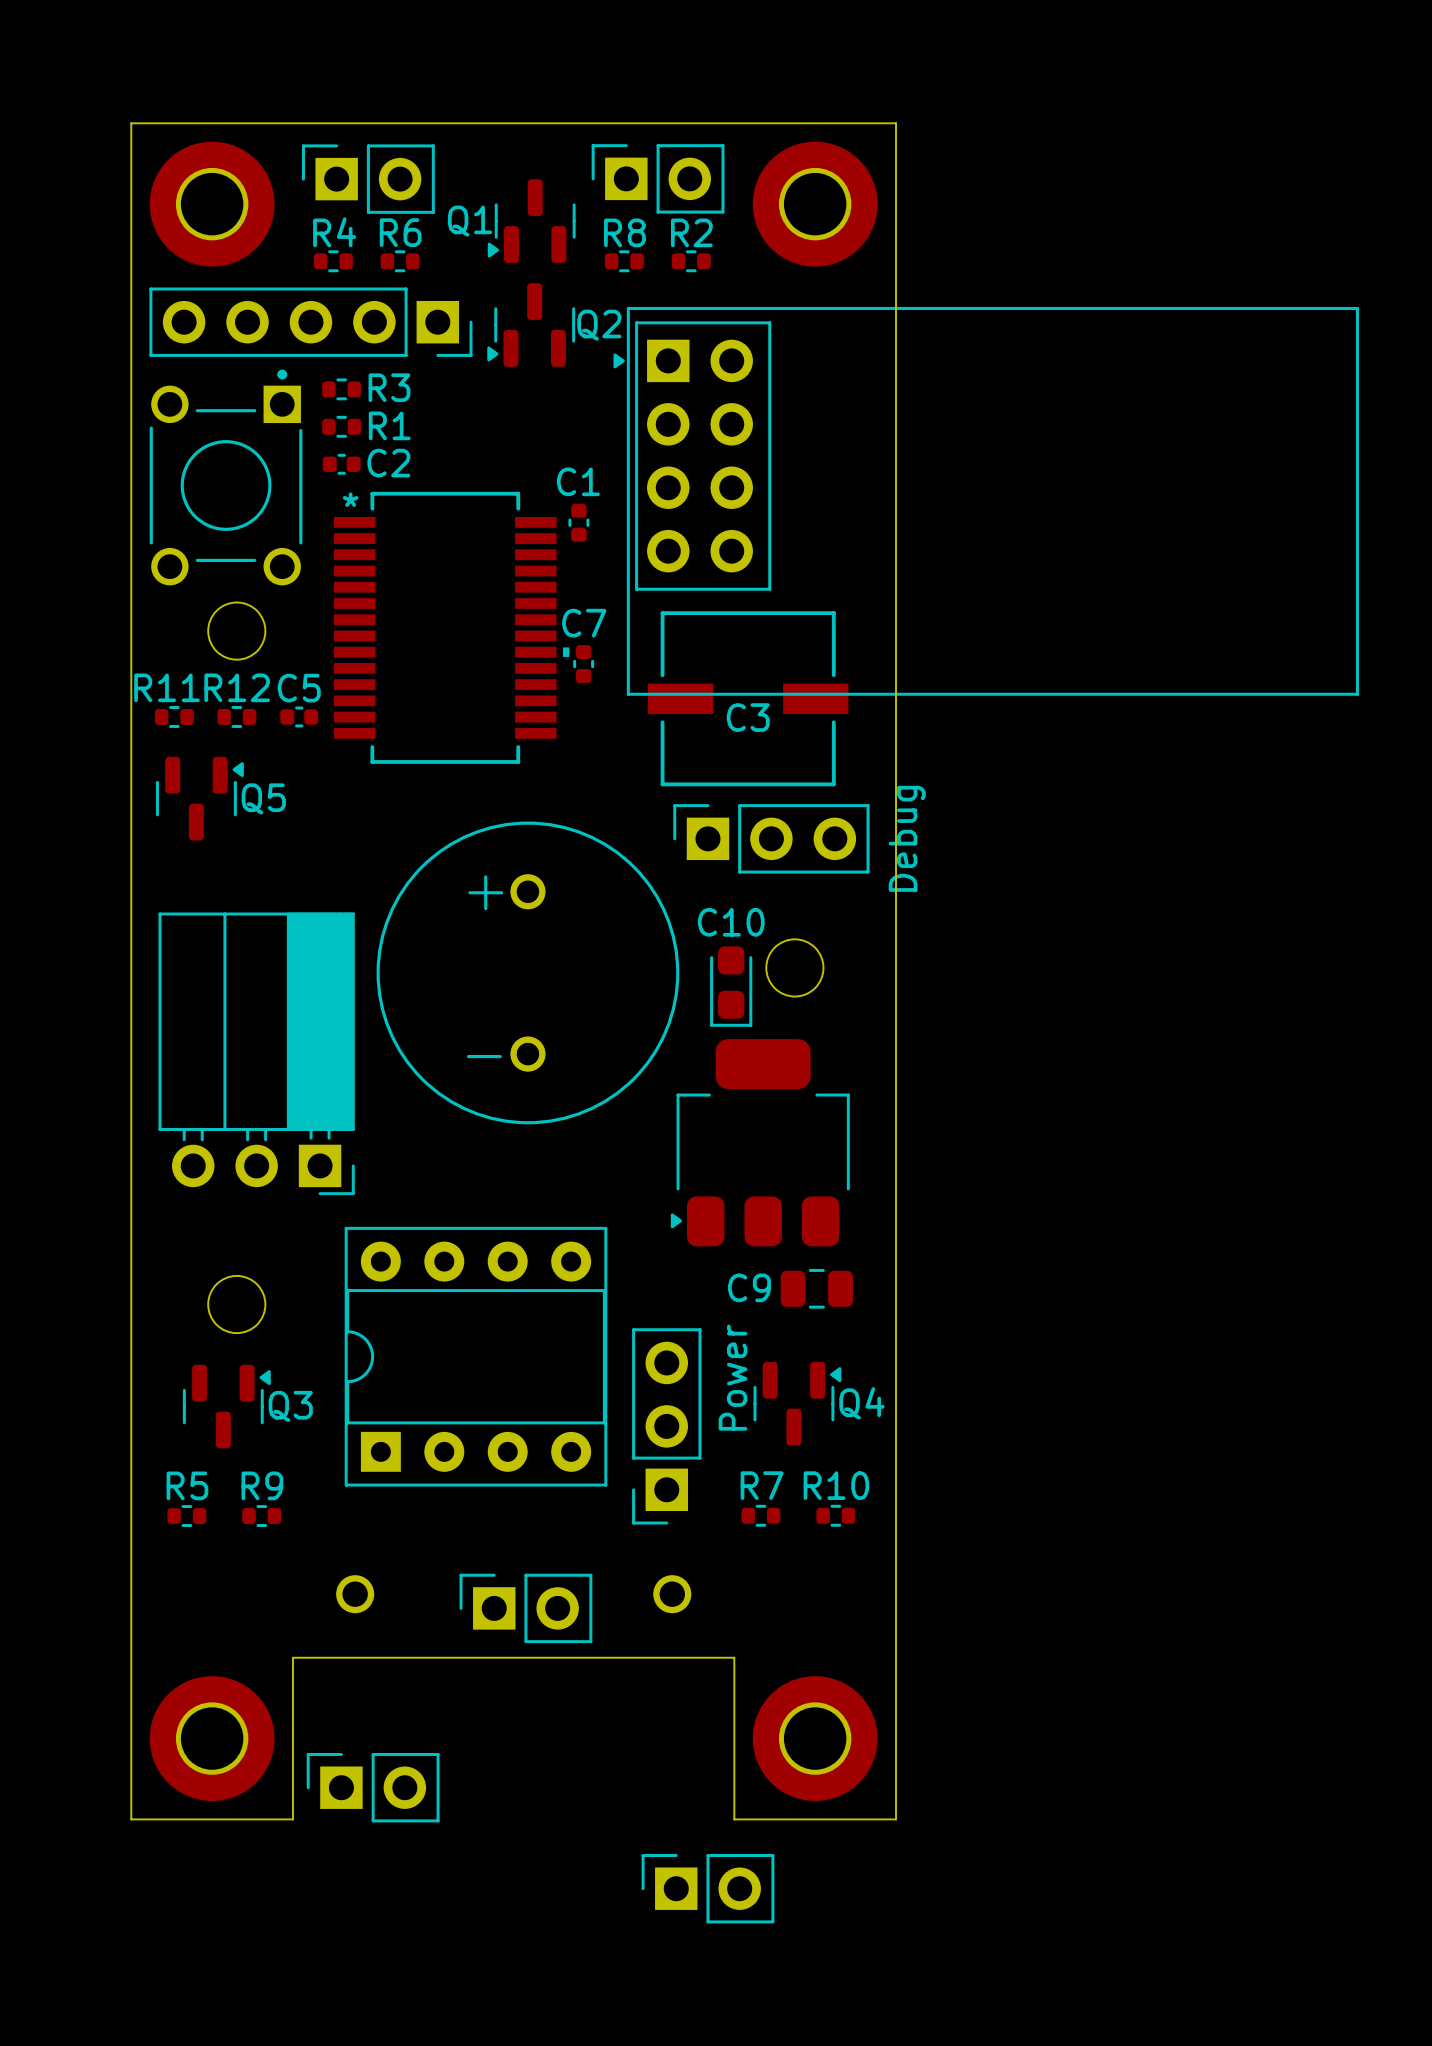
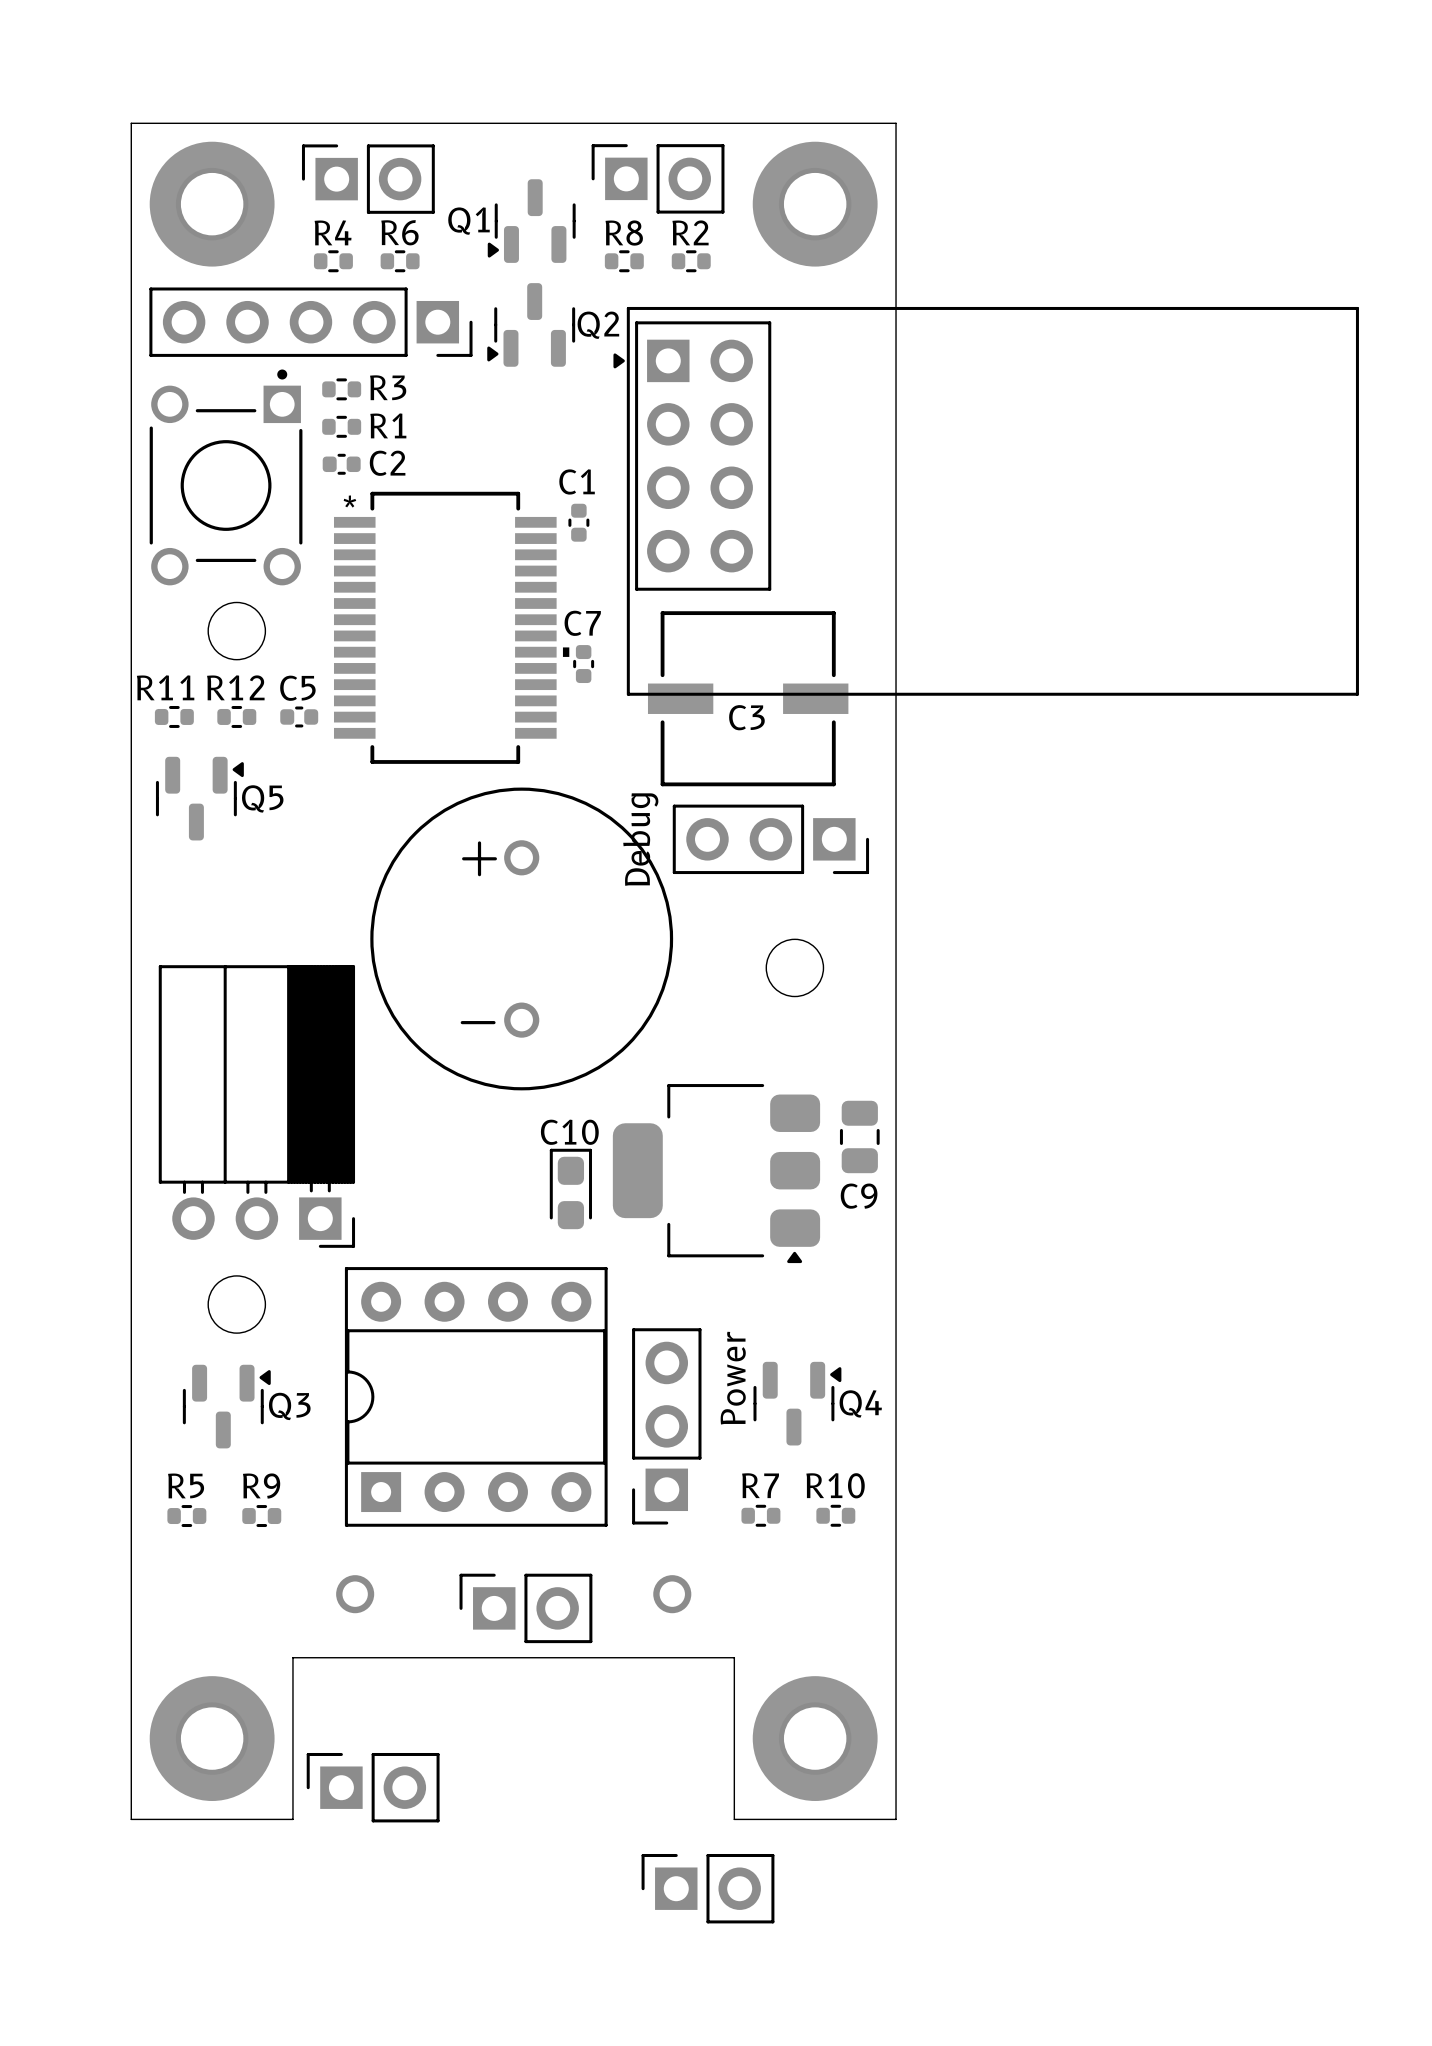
part rotation: 0° (771, 838) -> 180° (770, 839)
part position: (527, 972) -> (521, 938)
C10 rotation: 0° (731, 986) -> 180° (570, 1188)
C10 position: (731, 986) -> (570, 1188)
part position: (256, 1053) -> (256, 1106)
part rotation: 0° (760, 1142) -> 90° counterclockwise (716, 1173)
C9 name position: C9 (749, 1287) -> C9 (859, 1196)
C9 rotation: 0° (816, 1288) -> 90° clockwise (859, 1136)
C9 position: (816, 1288) -> (859, 1136)
part position: (476, 1356) -> (476, 1396)

